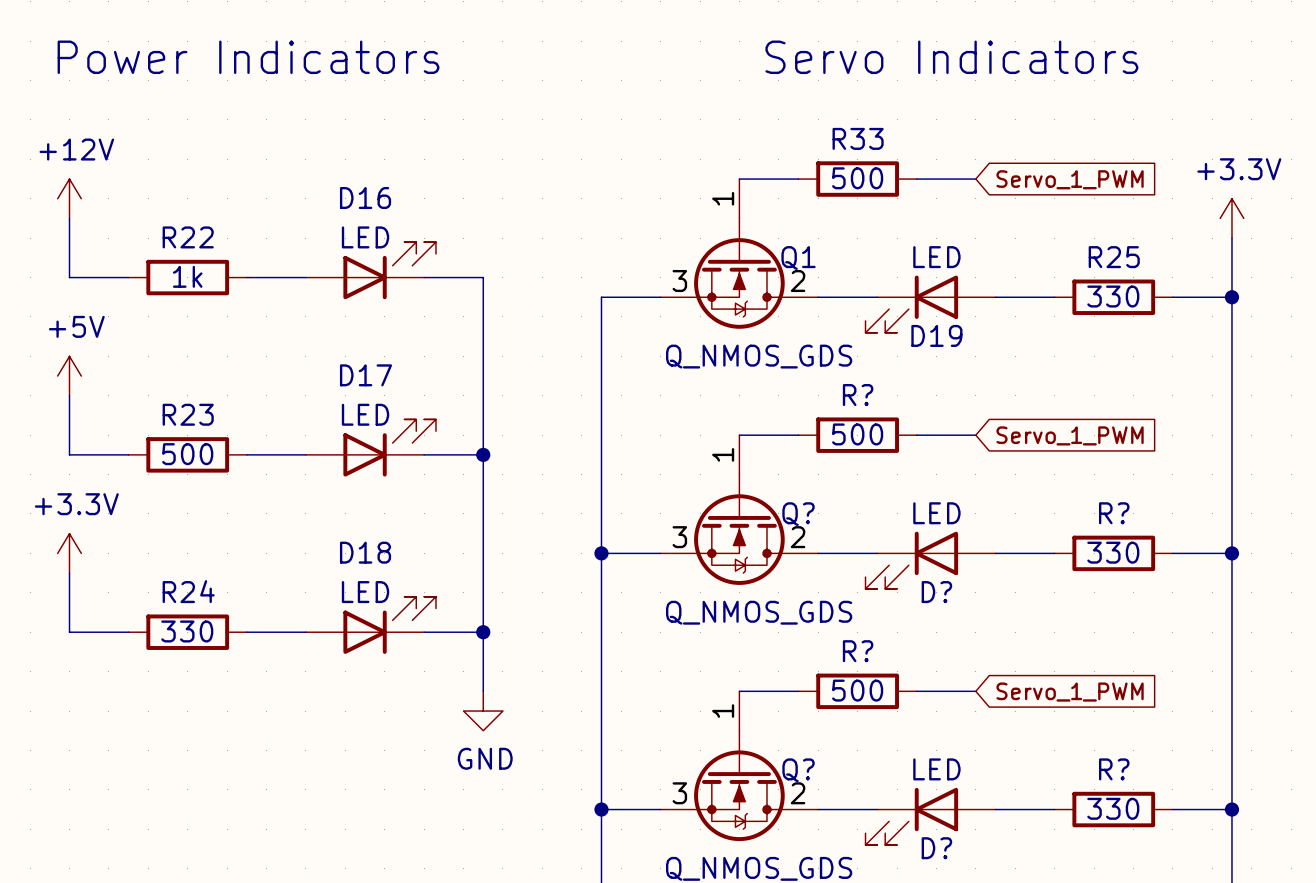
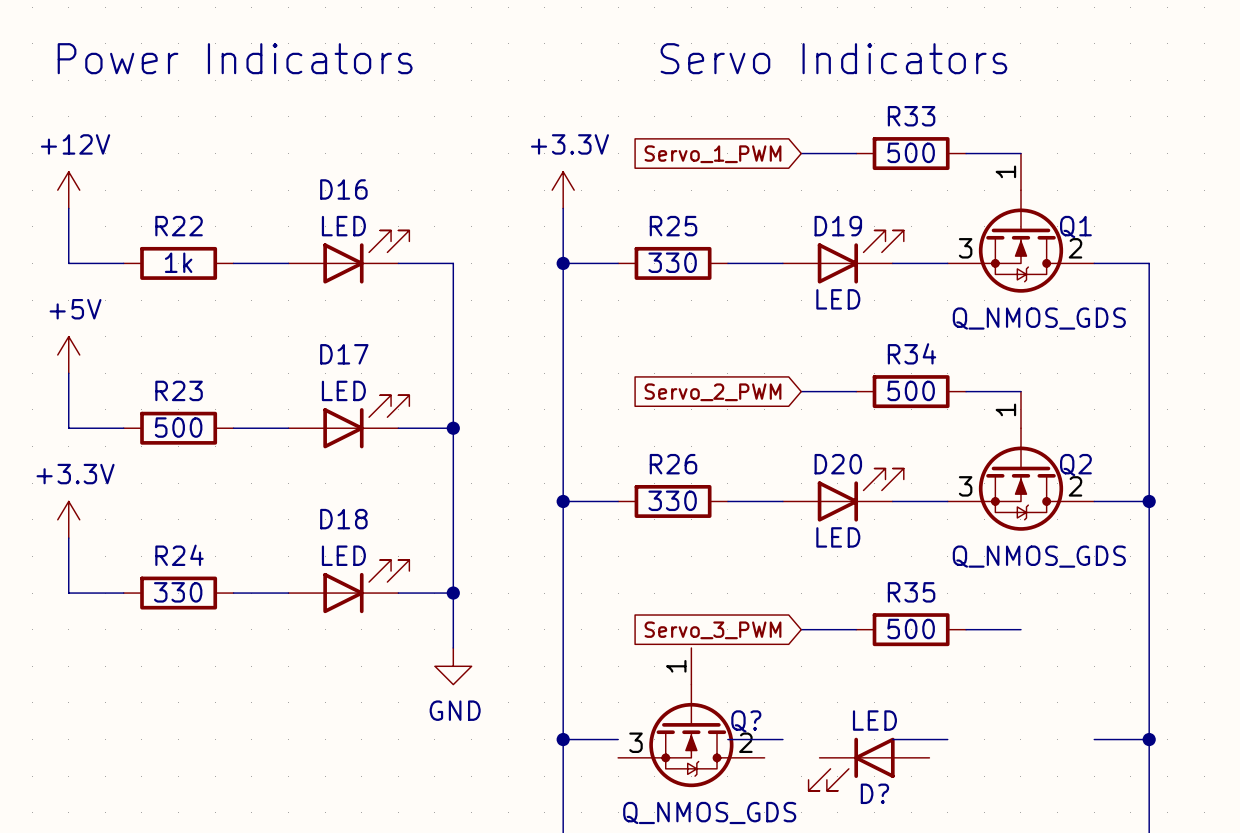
text position: Servo Indicators (951, 57) -> Servo Indicators (833, 58)
wire: (739, 179) (798, 179) -> (801, 153) (856, 153)
R33 position: (857, 179) -> (911, 153)
wire: (916, 179) (975, 179) -> (966, 153) (1020, 153)
global label rotation: 0° (1070, 179) -> 180° (712, 154)
global label position: Servo_1_PWM (1070, 179) -> Servo_1_PWM (712, 154)
power symbol: none -> +3.3V (563, 190)
power symbol: +3.3V (1231, 218) -> none
wire: (1231, 238) (1231, 277) -> (1094, 263) (1149, 263)
Q1 position: (739, 253) -> (1020, 223)
junction: none -> (563, 263)
wire: (601, 297) (660, 297) -> (563, 281) (563, 208)
wire: (818, 297) (877, 297) -> (563, 263) (618, 263)
wire: (995, 297) (1054, 297) -> (727, 263) (782, 263)
R25 position: (1113, 297) -> (673, 263)
wire: (1172, 297) (1231, 297) -> (892, 263) (947, 263)
junction: (1231, 297) -> none
D19 rotation: 0° (911, 304) -> 180° (860, 257)
R34: none -> 500 (911, 391)
global label: none -> Servo_2_PWM (712, 392)
wire: (739, 435) (798, 435) -> (801, 391) (856, 391)
R?: 500 (857, 435) -> none
wire: (916, 435) (975, 435) -> (966, 391) (1020, 391)
global label: Servo_1_PWM (1070, 435) -> none
Q2: none -> Q_NMOS_GDS (1020, 461)
Q?: Q_NMOS_GDS (739, 510) -> none
D20: none -> LED (843, 495)
R26: none -> 330 (673, 501)
wire: none -> (1094, 501) (1149, 501)
wire: (601, 553) (660, 553) -> none
junction position: (601, 553) -> (563, 501)
wire: (818, 553) (877, 553) -> (563, 501) (618, 501)
wire: (995, 553) (1054, 553) -> (727, 501) (782, 501)
R?: 330 (1113, 553) -> none
wire: (1172, 553) (1231, 553) -> (892, 501) (947, 501)
junction position: (1231, 553) -> (1149, 501)
D?: LED (930, 560) -> none
R35: none -> 500 (911, 629)
global label: none -> Servo_3_PWM (712, 630)
wire: (739, 691) (798, 691) -> (801, 629) (856, 629)
R?: 500 (857, 691) -> none
wire: (916, 691) (975, 691) -> (966, 629) (1020, 629)
global label: Servo_1_PWM (1070, 692) -> none
wire: none -> (1094, 739) (1149, 739)
wire: (601, 809) (660, 809) -> none
junction position: (601, 809) -> (563, 739)
wire: (818, 809) (877, 809) -> (563, 739) (618, 739)
wire: (995, 809) (1054, 809) -> (727, 739) (782, 739)
R?: 330 (1113, 809) -> none
wire: (1172, 809) (1231, 809) -> (892, 739) (947, 739)
junction position: (1231, 809) -> (1149, 739)

